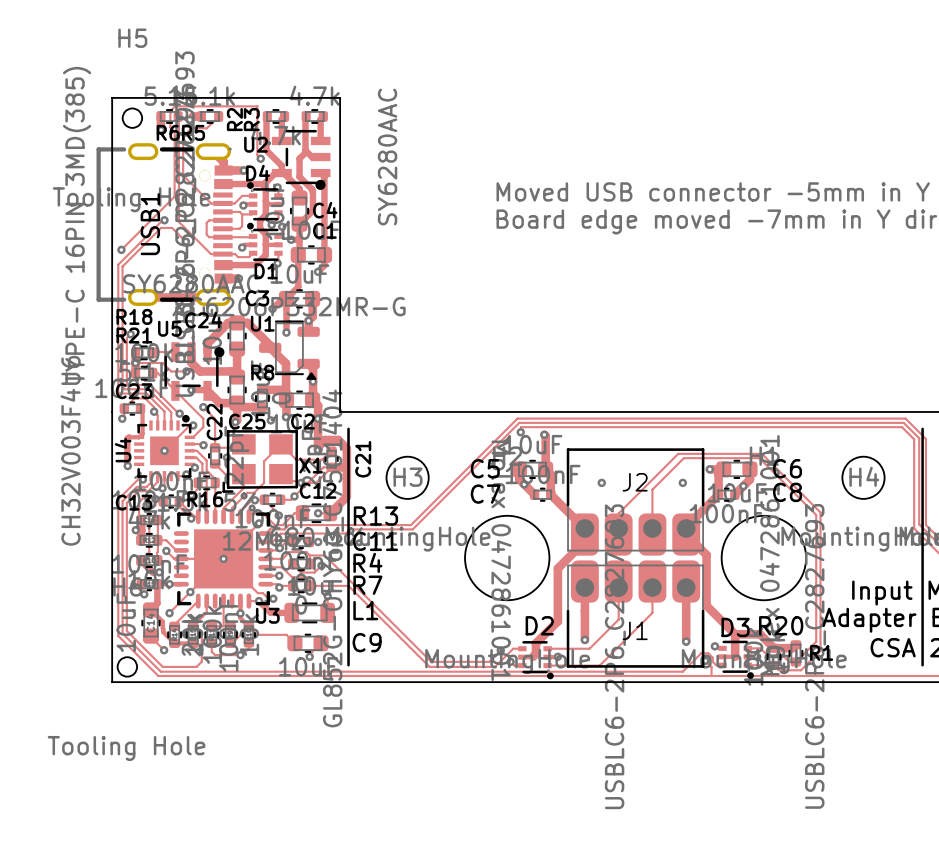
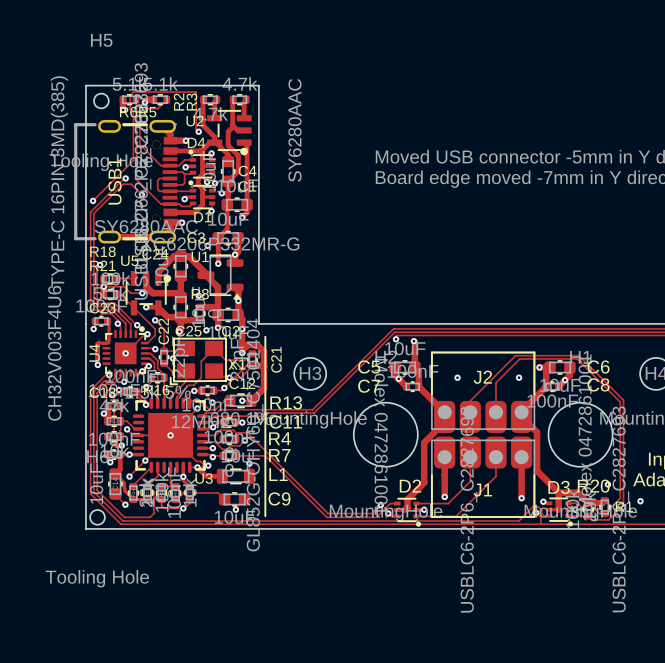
via: none -> (607, 484)
via: none -> (640, 501)

